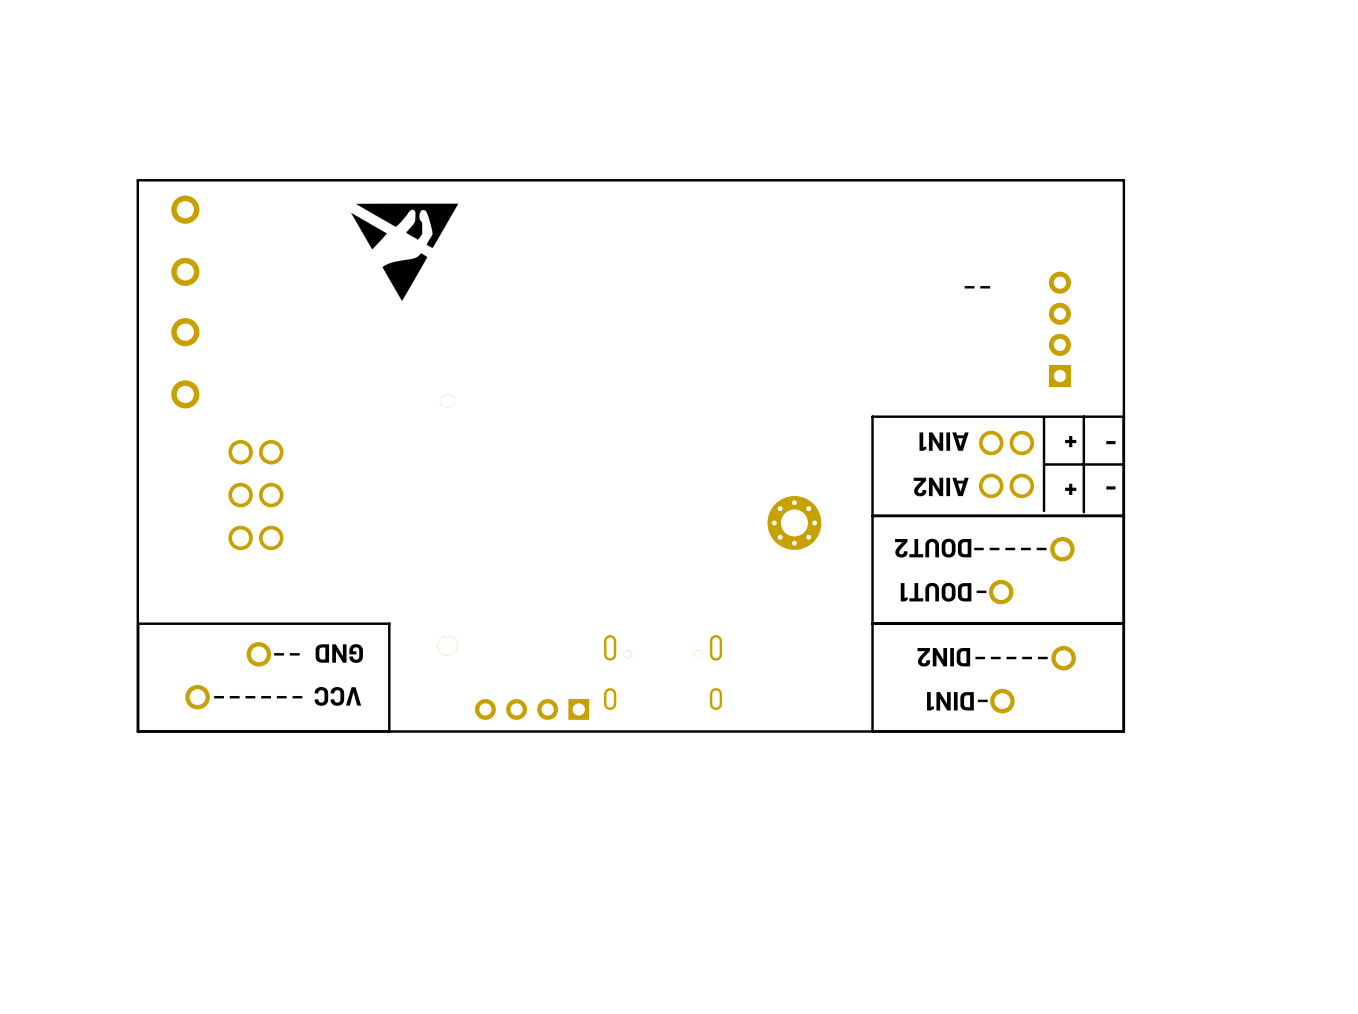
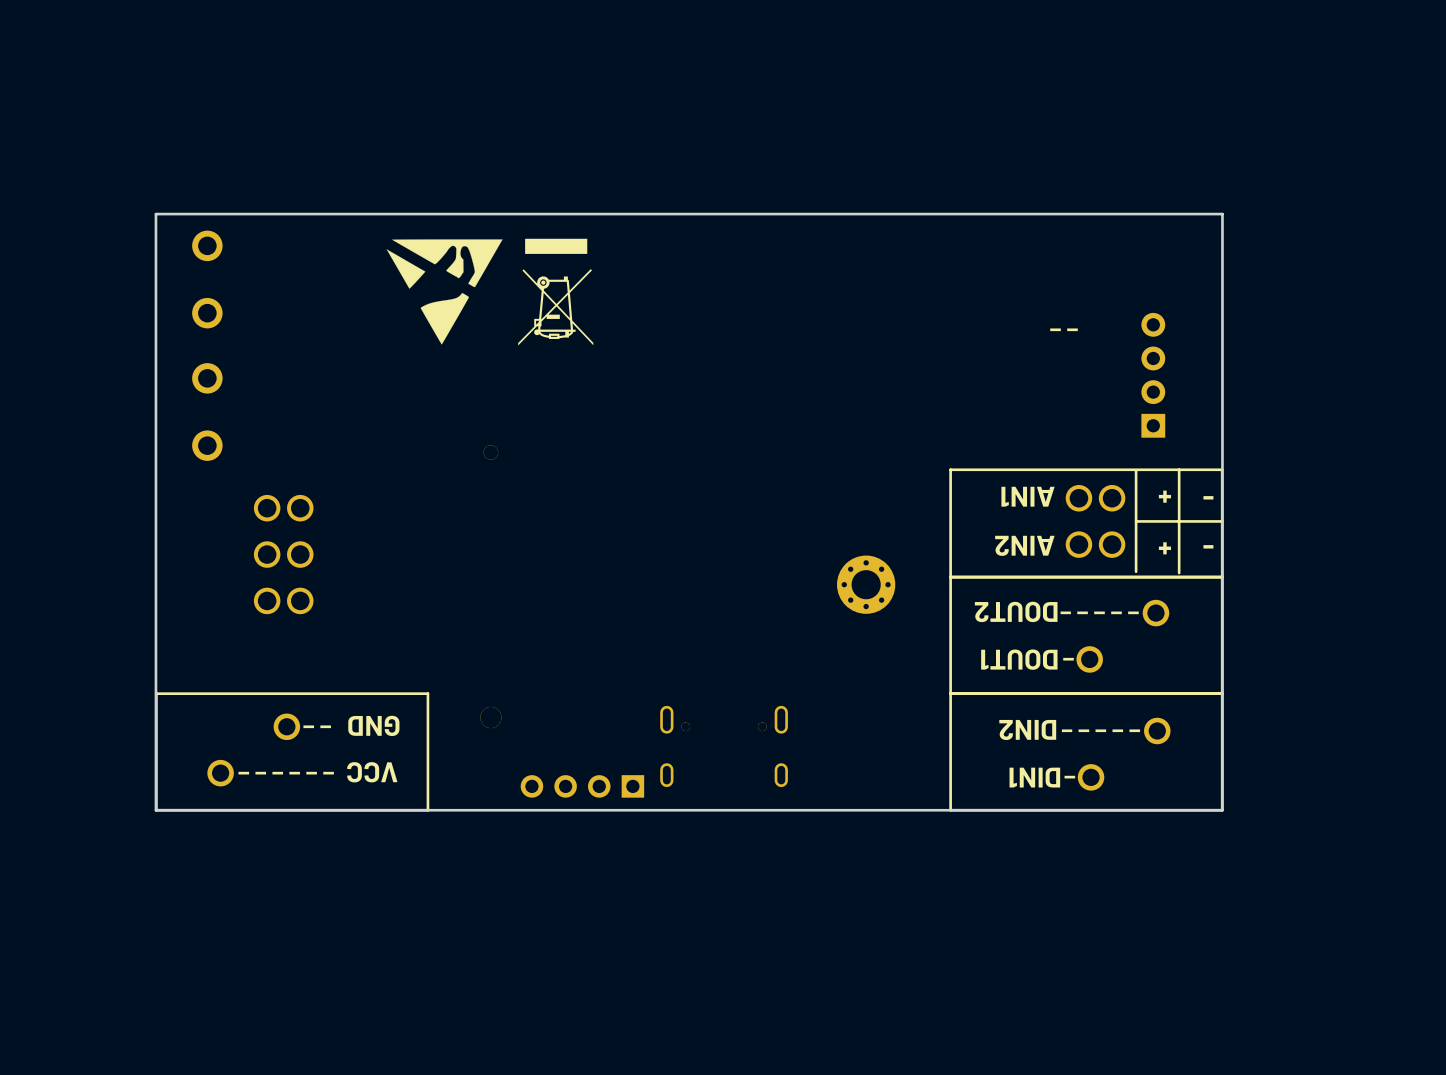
drawing: none -> [518, 238, 594, 346]

